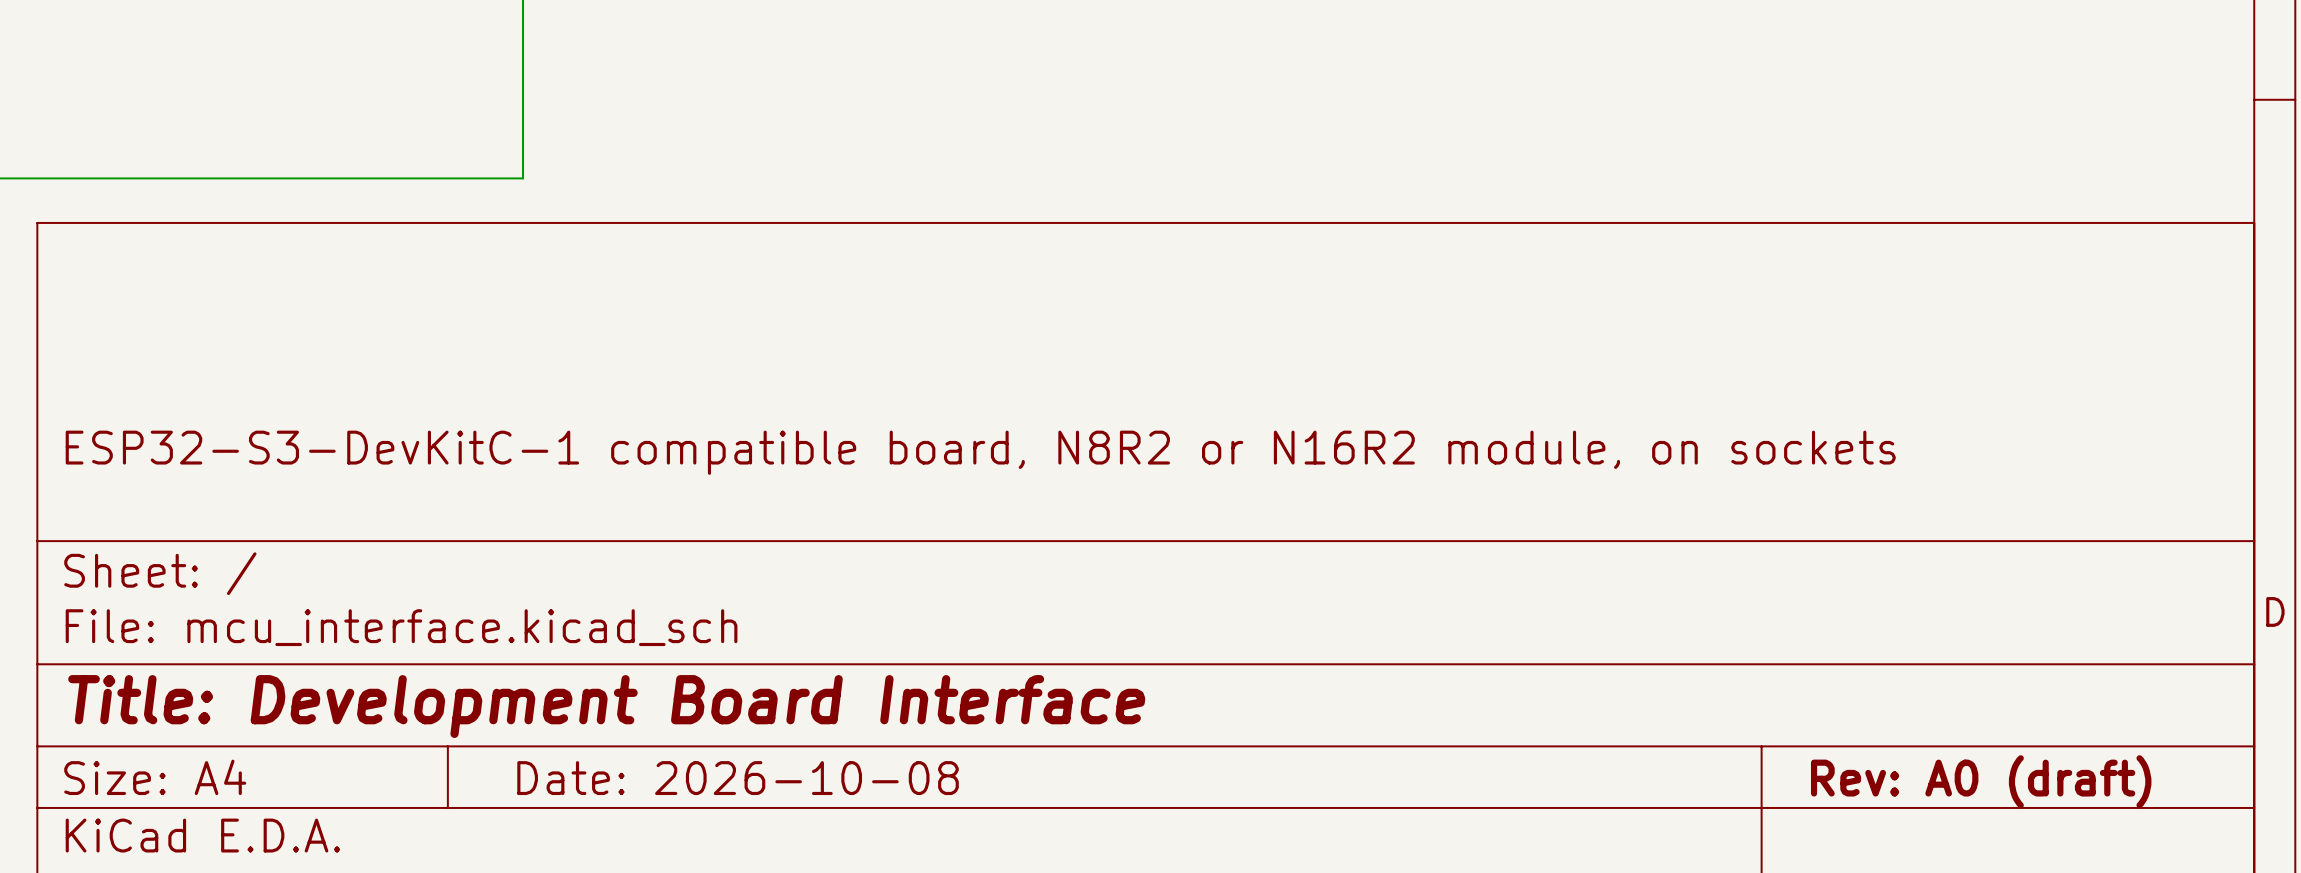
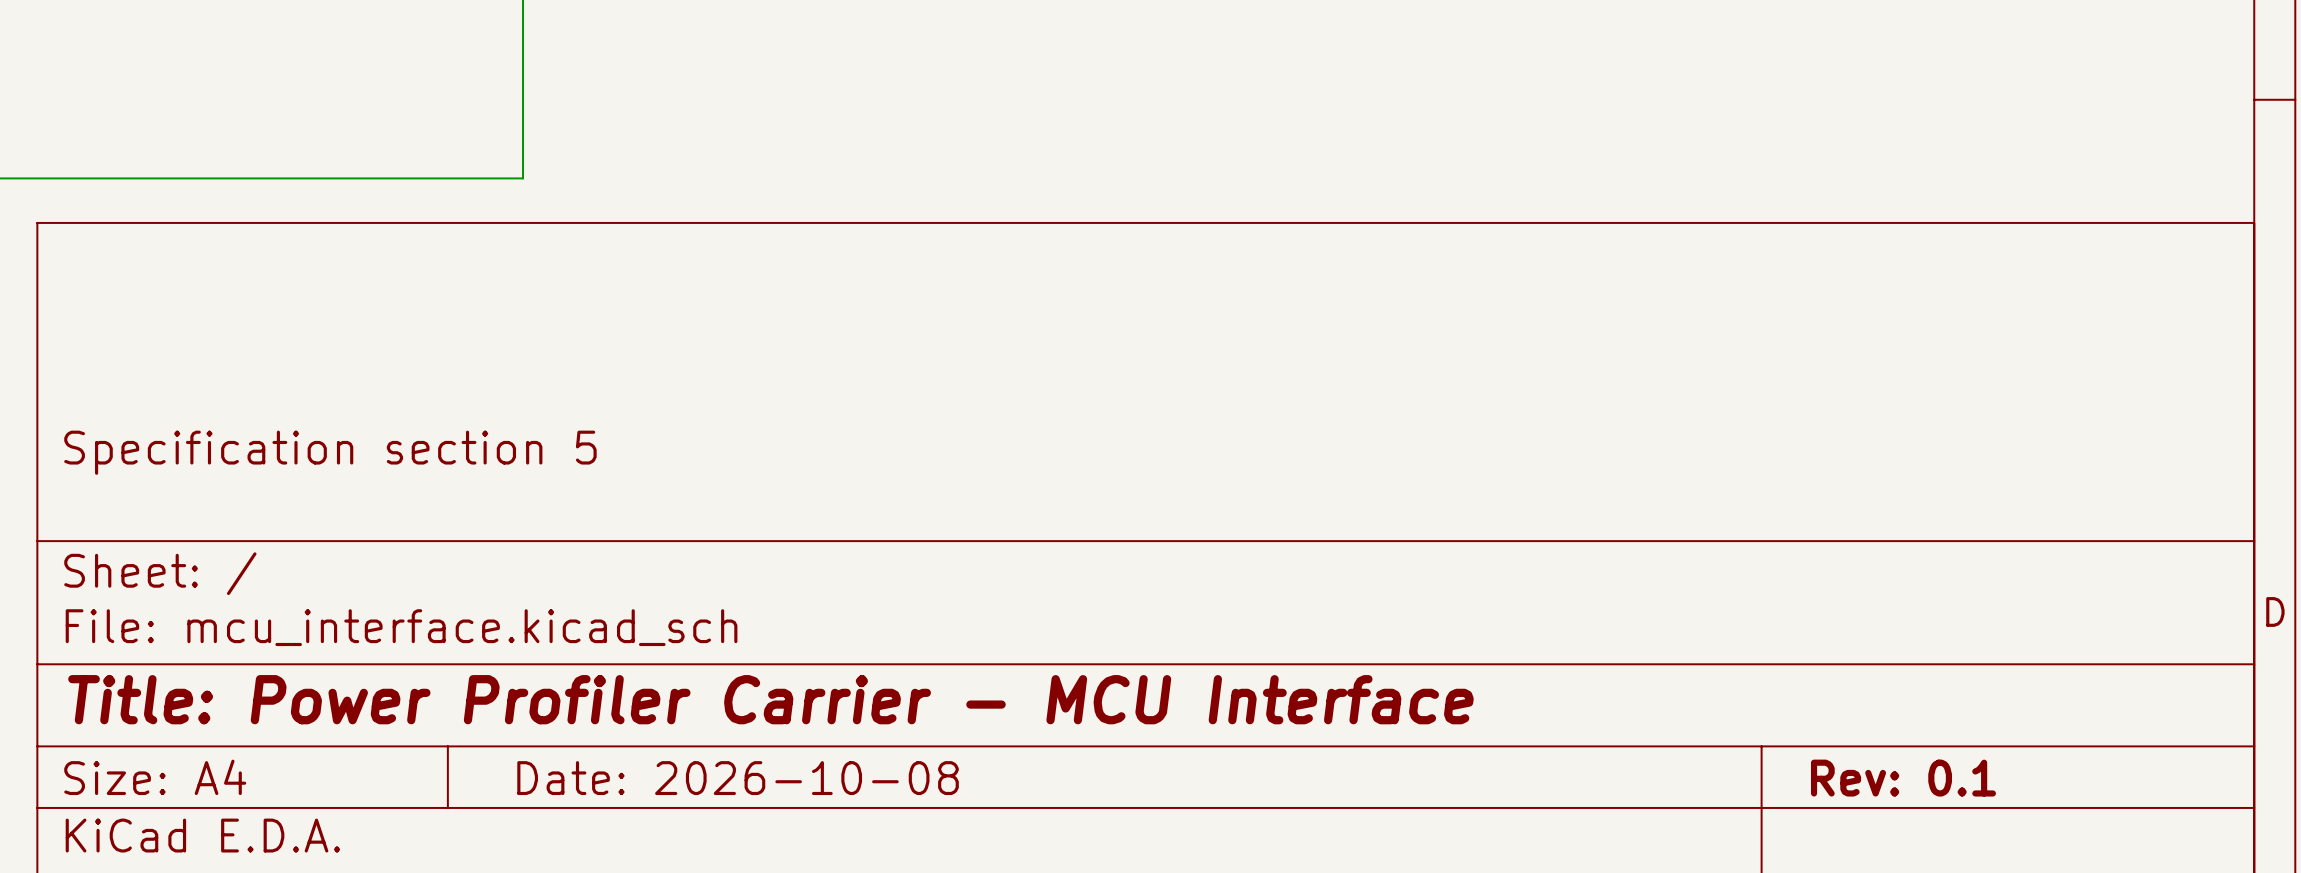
title block: ESP32-S3-DevKitC-1 compatible board, N8R2 or N16R2 module, on sockets (980, 452) -> Specification section 5 (330, 452)
title block: Title: Development Board Interface (606, 706) -> Title: Power Profiler Carrier - MCU Interface (770, 699)
title block: Rev: A0 (draft) (1981, 781) -> Rev: 0.1 (1903, 778)

